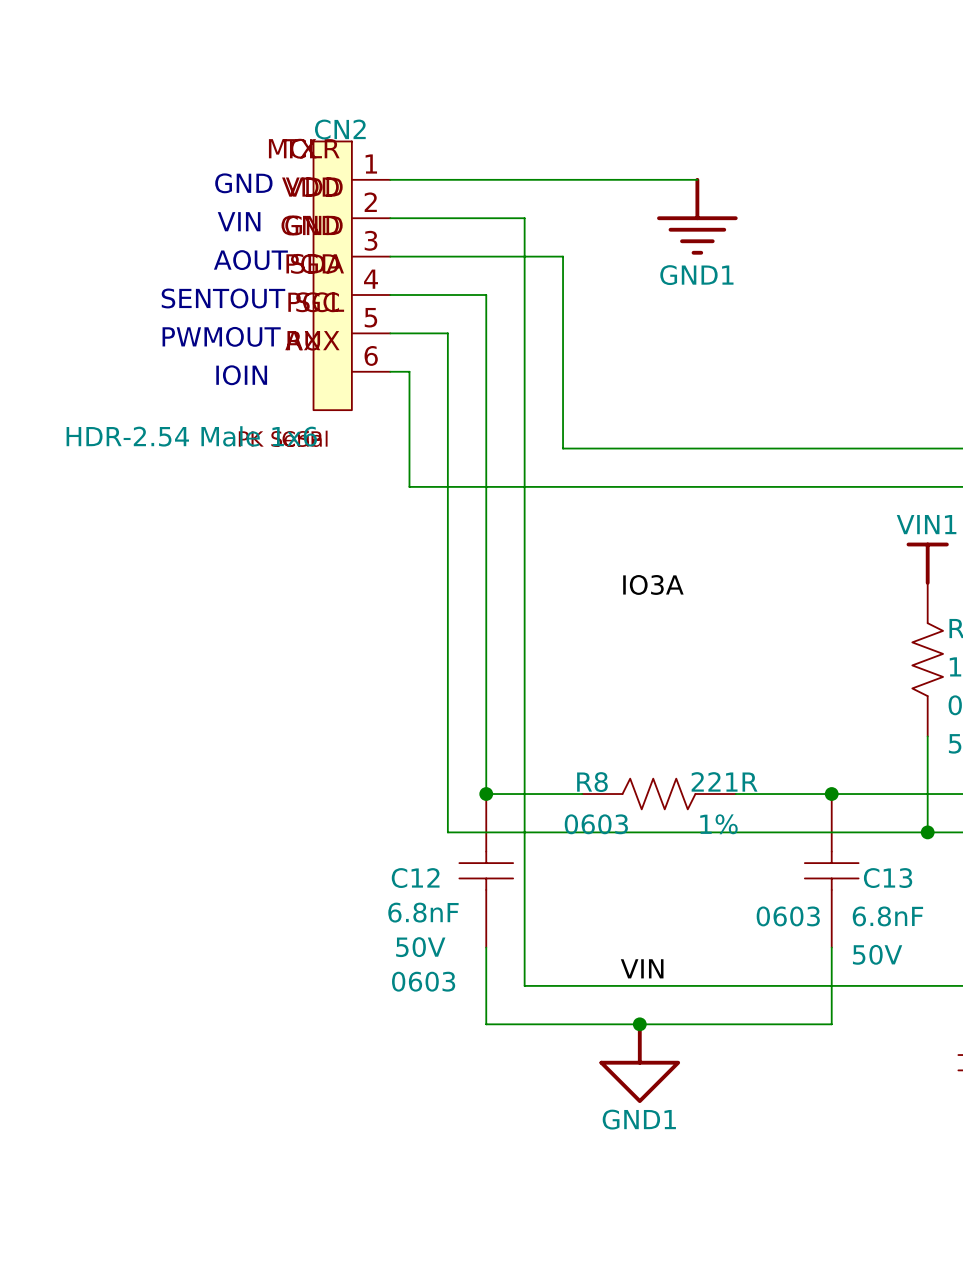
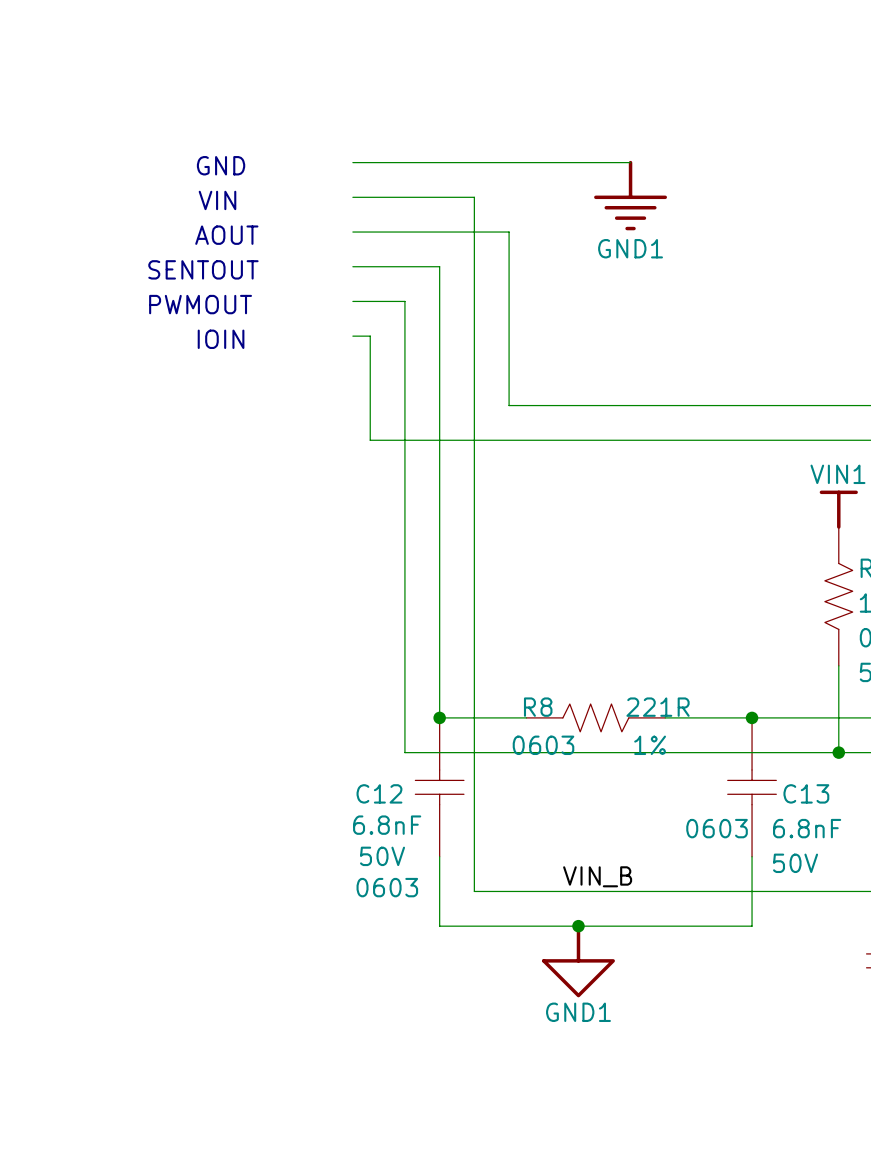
CN2: (351, 275) -> none
label: IO3A (653, 584) -> none
label: VIN (642, 968) -> VIN_B (597, 876)

